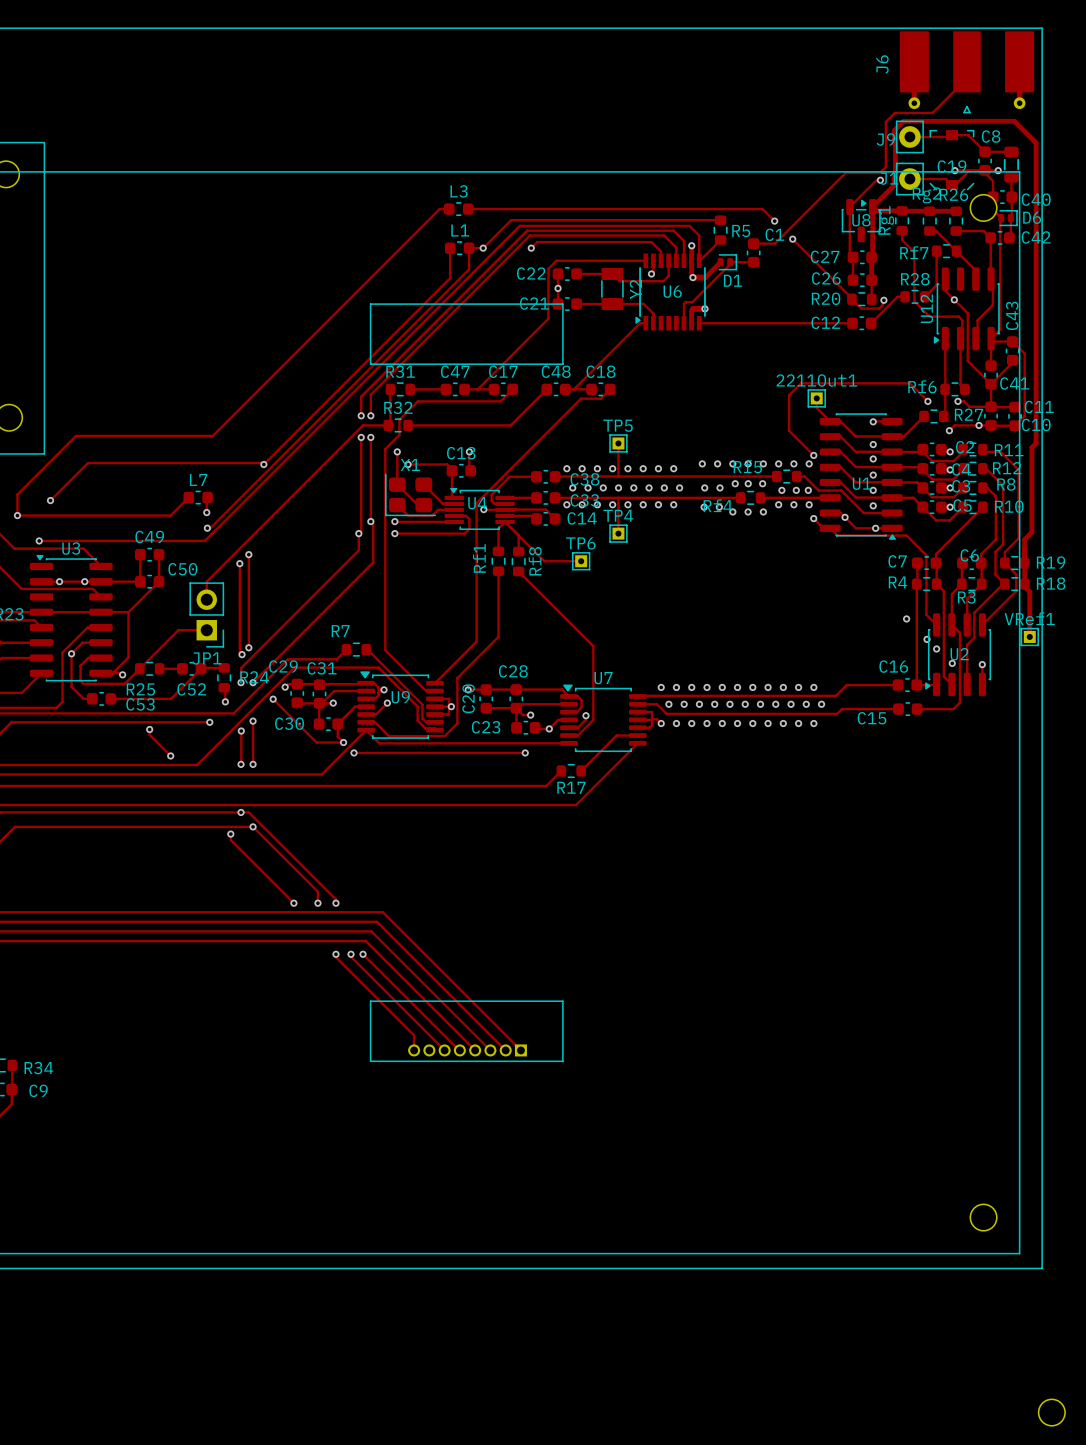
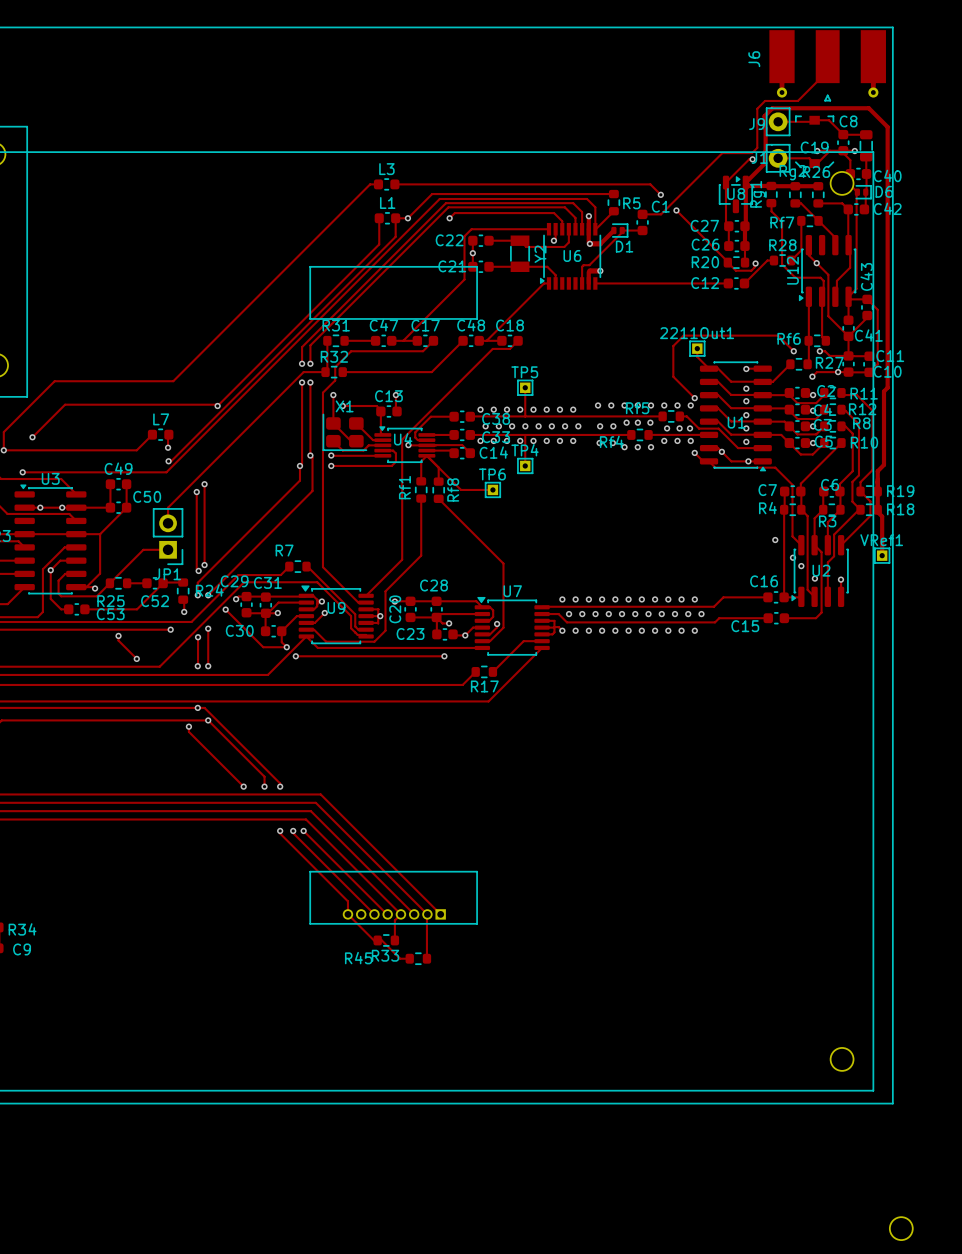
track: none -> (347, 914) (374, 940) (381, 940) (400, 958) (409, 958)
track: none -> (400, 914) (394, 920) (394, 940)
track: none -> (427, 914) (426, 958)
R45: none -> (386, 940)
R33: none -> (418, 958)

